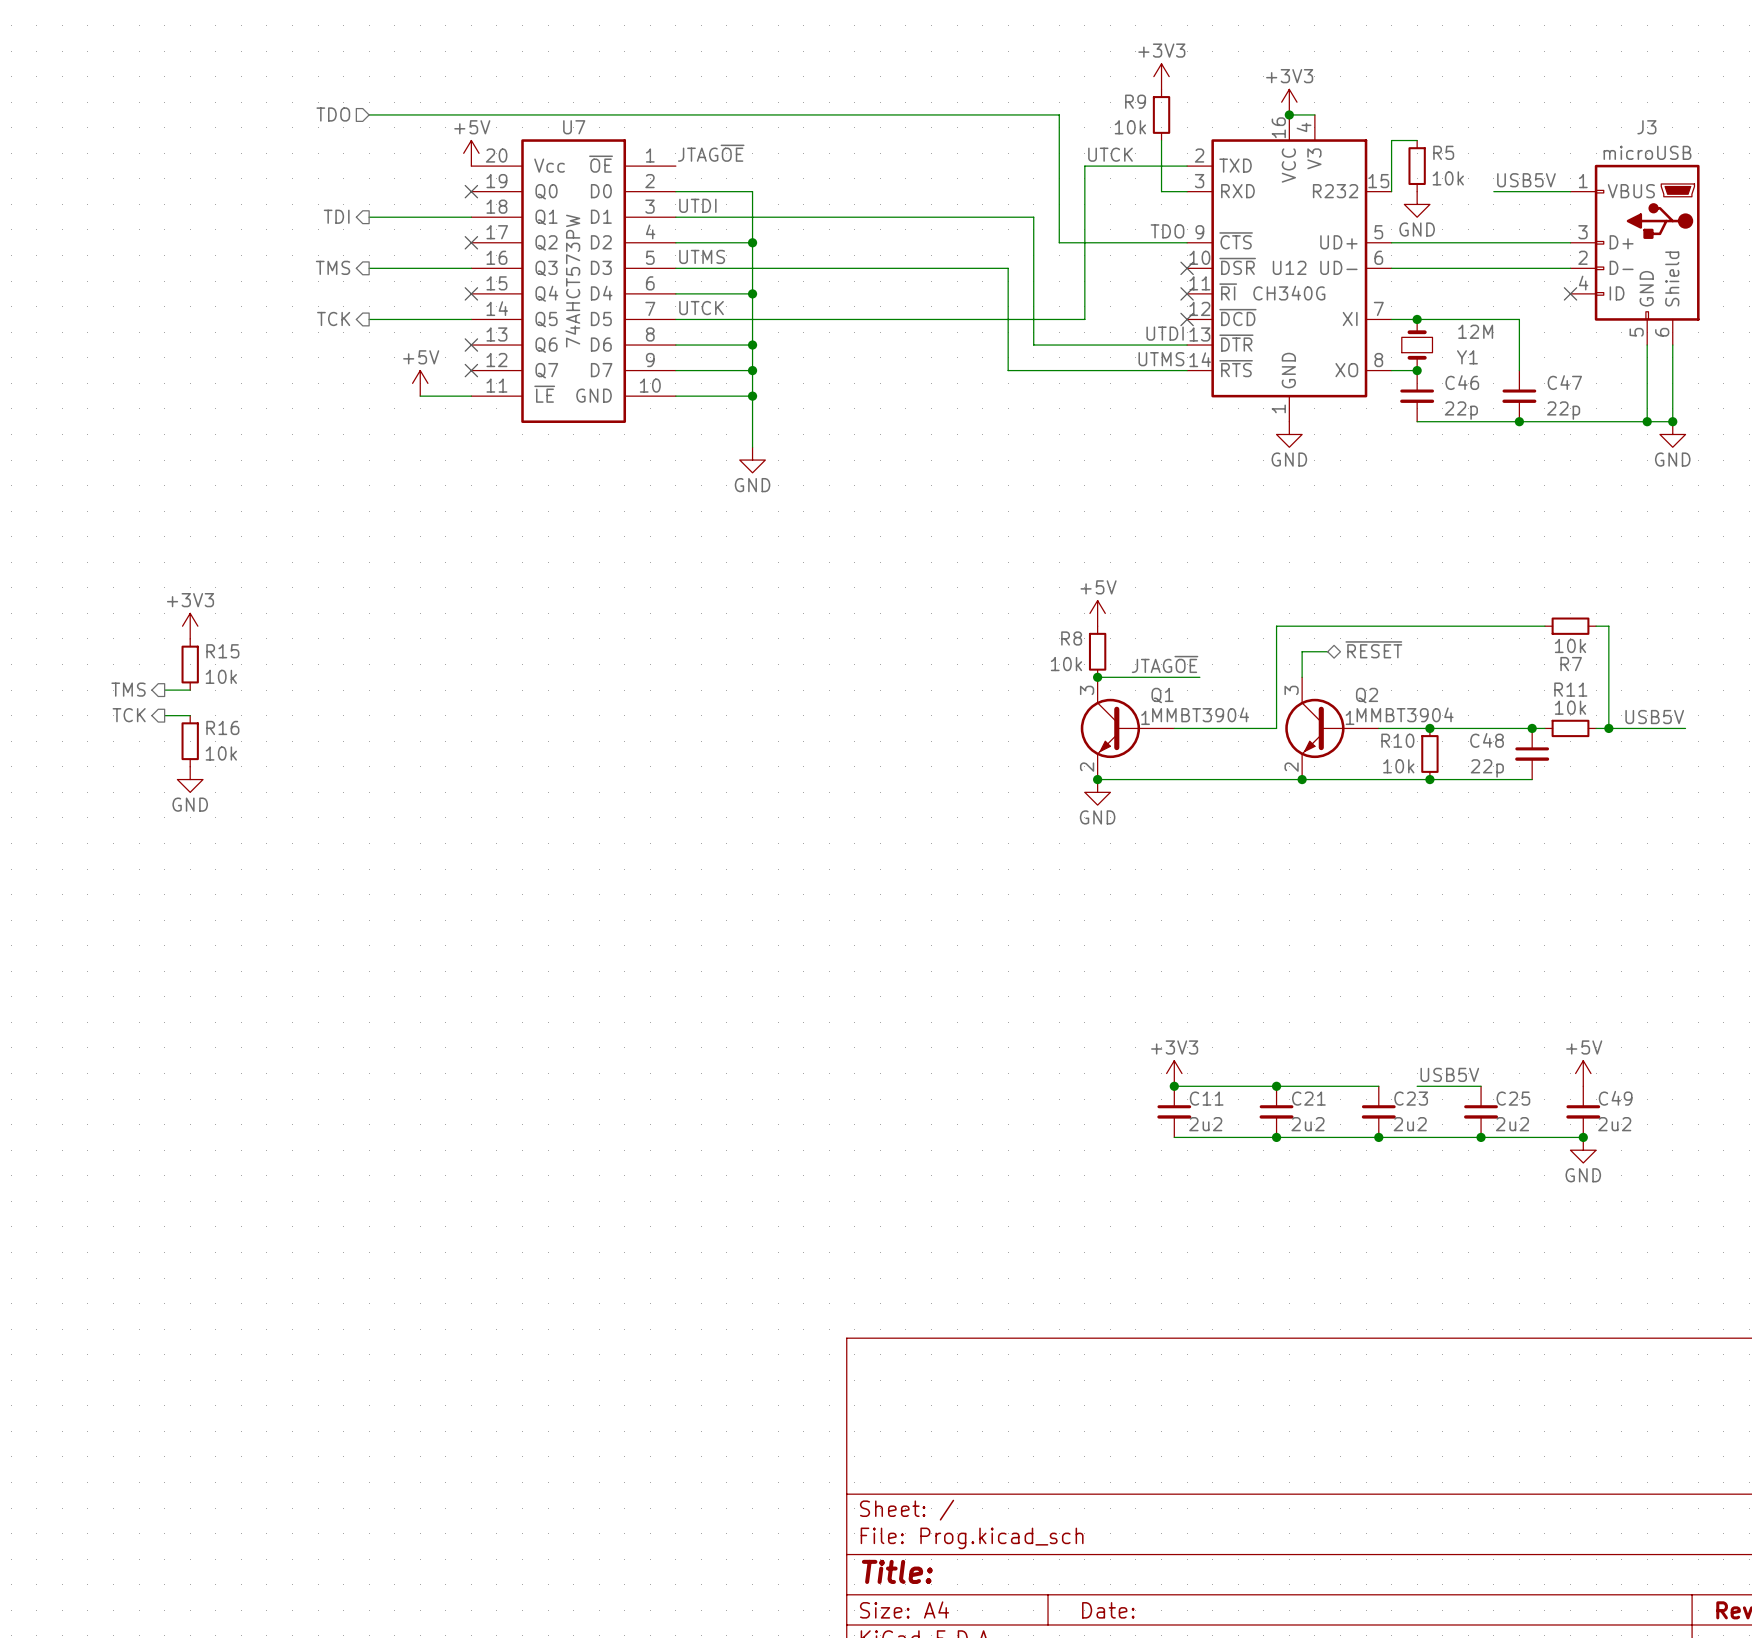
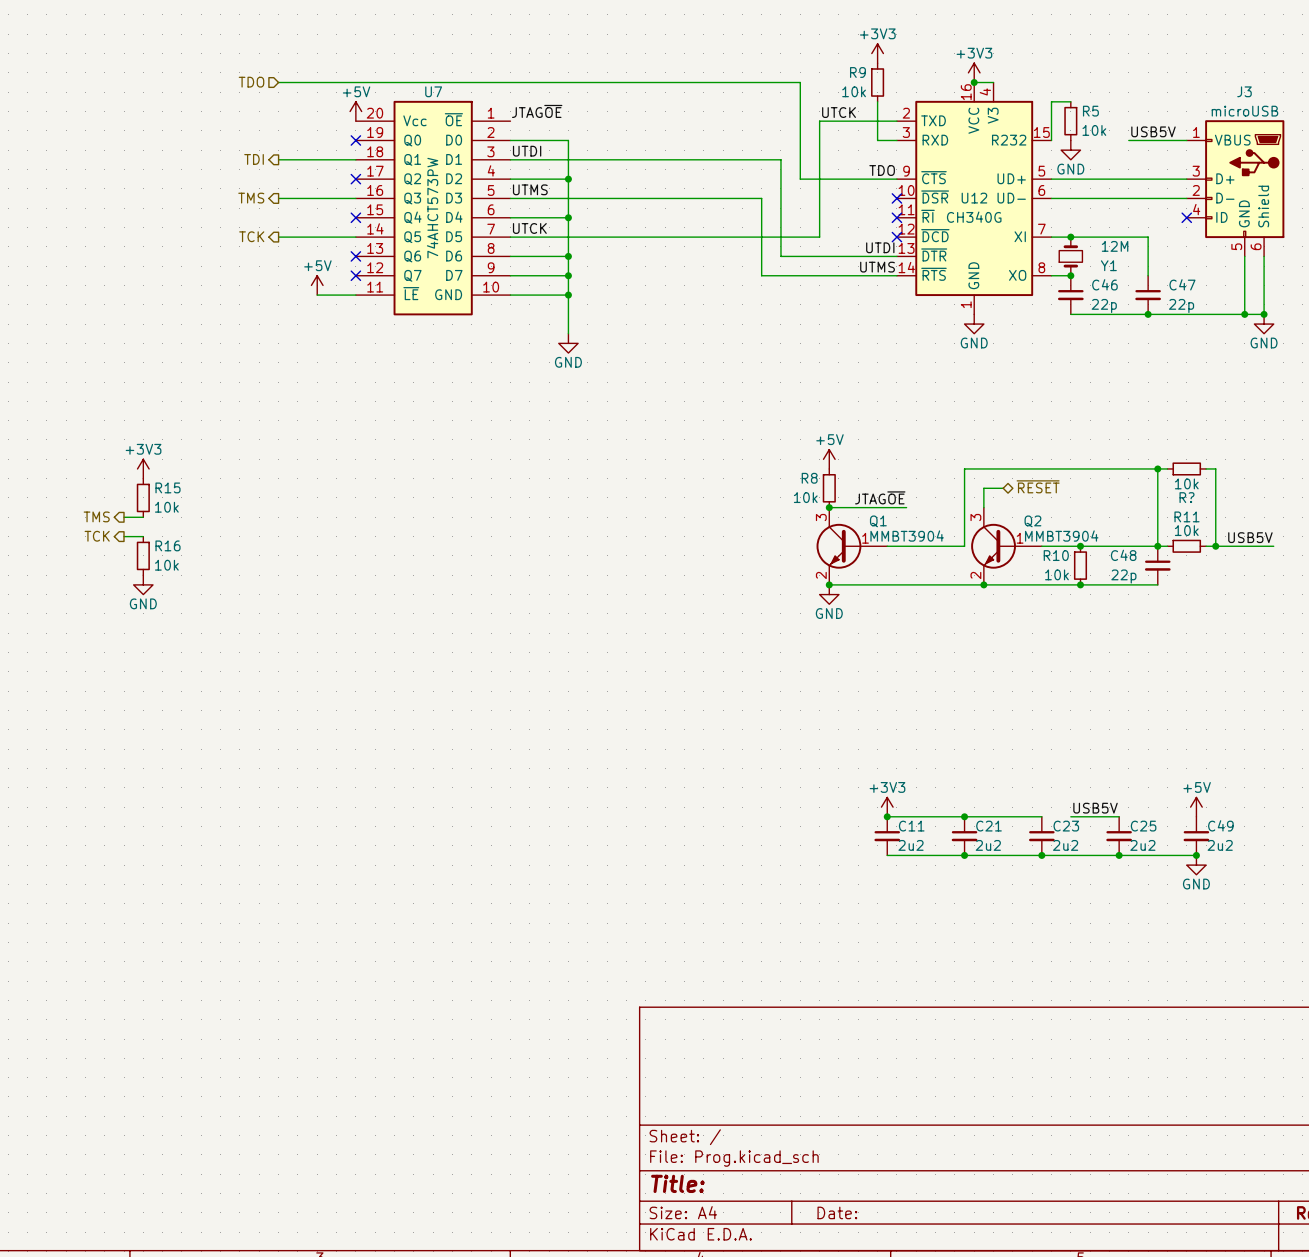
wire: none -> (1157, 468) (1157, 546)
junction: none -> (1157, 468)
R7 name: R7 (1571, 664) -> R? (1187, 497)

